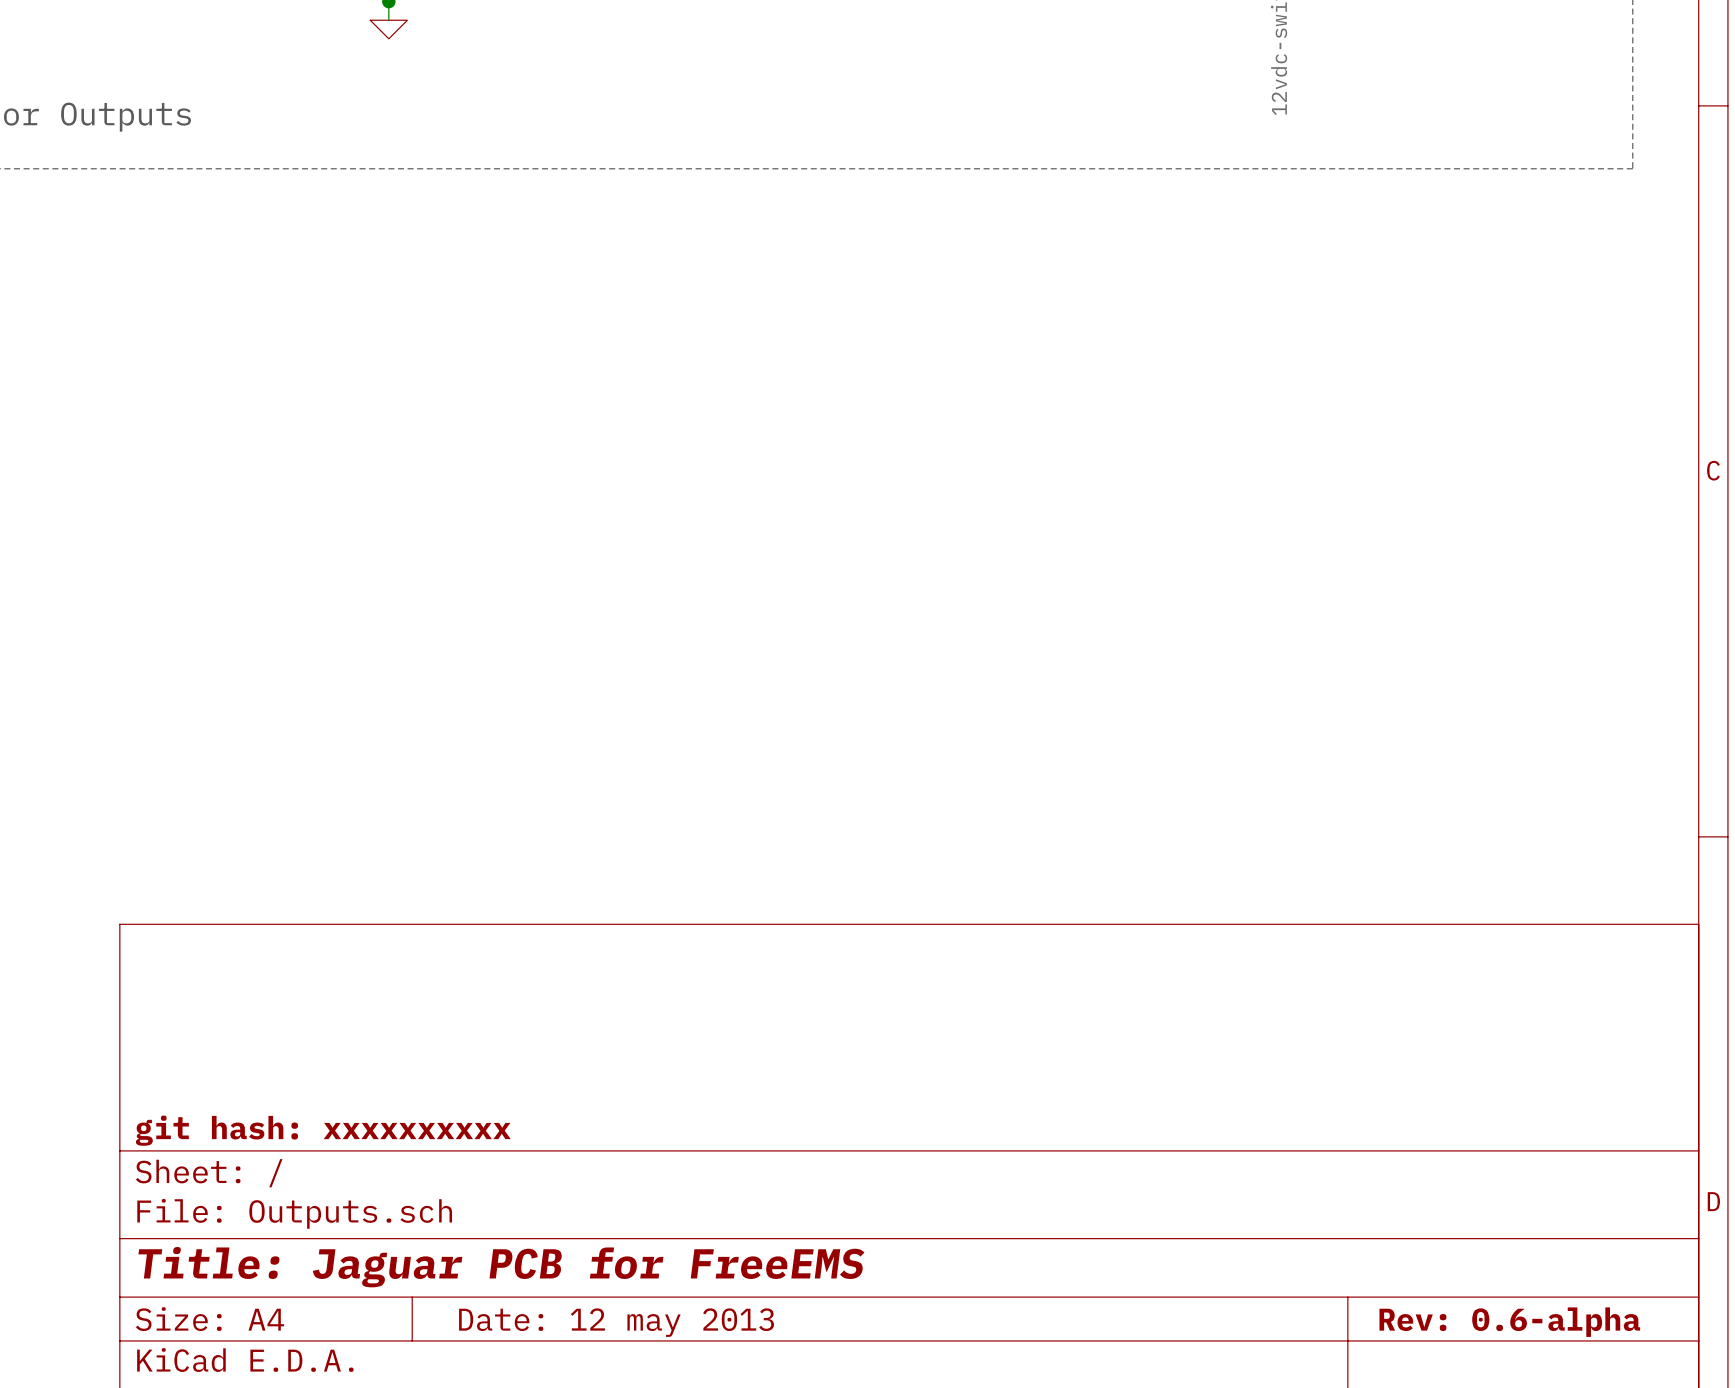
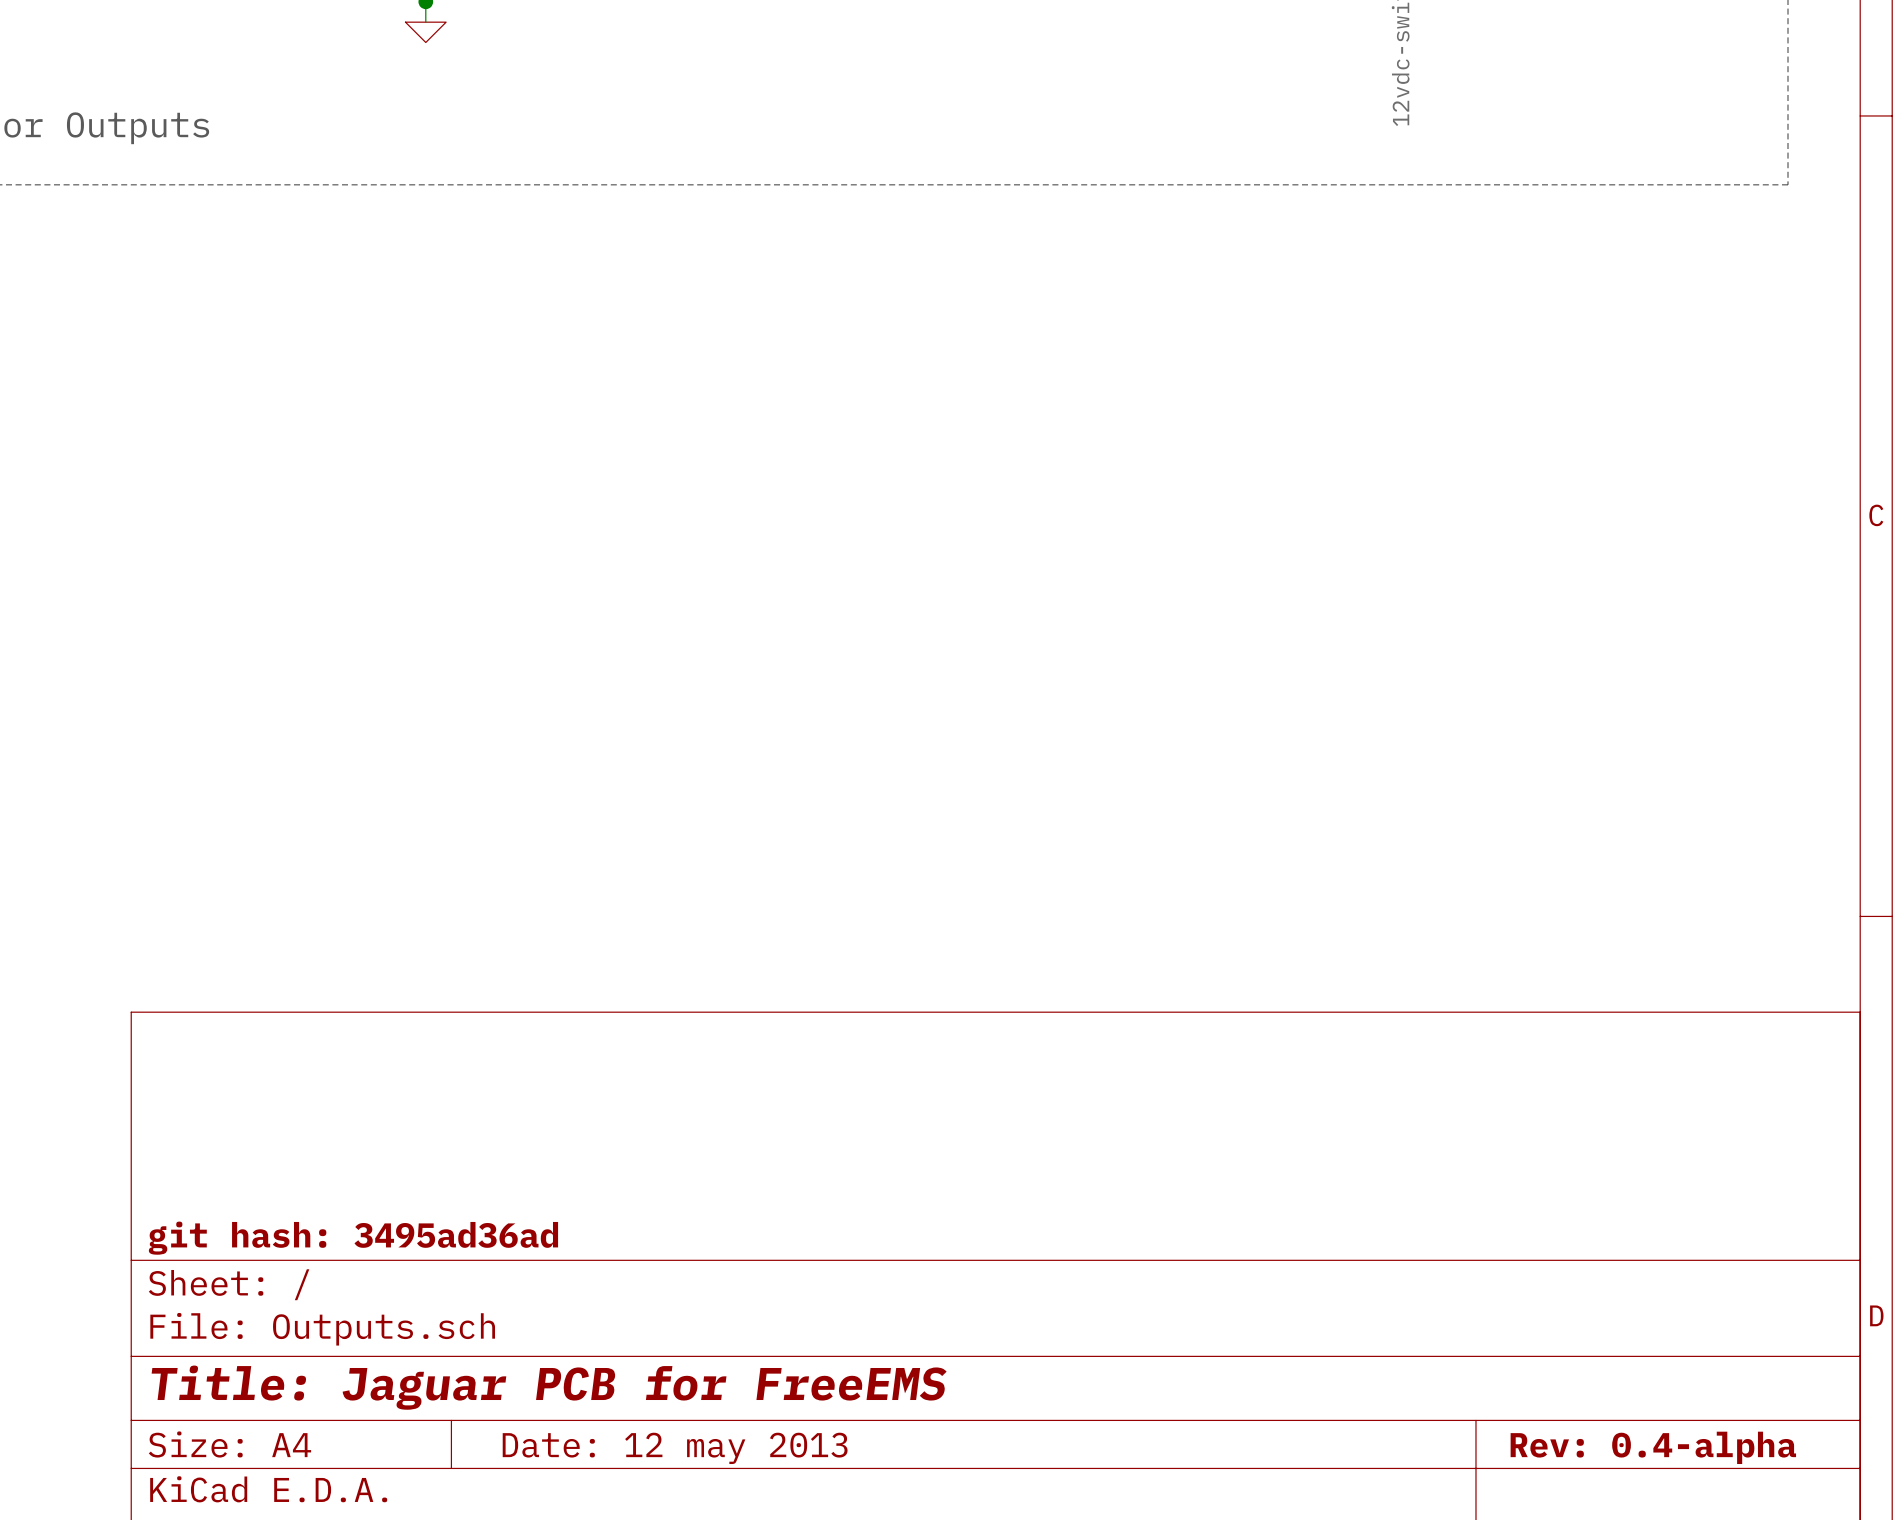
title block: git hash: xxxxxxxxxx (323, 1130) -> git hash: 3495ad36ad (353, 1238)
title block: Rev: 0.6-alpha (1509, 1322) -> Rev: 0.4-alpha (1653, 1447)

